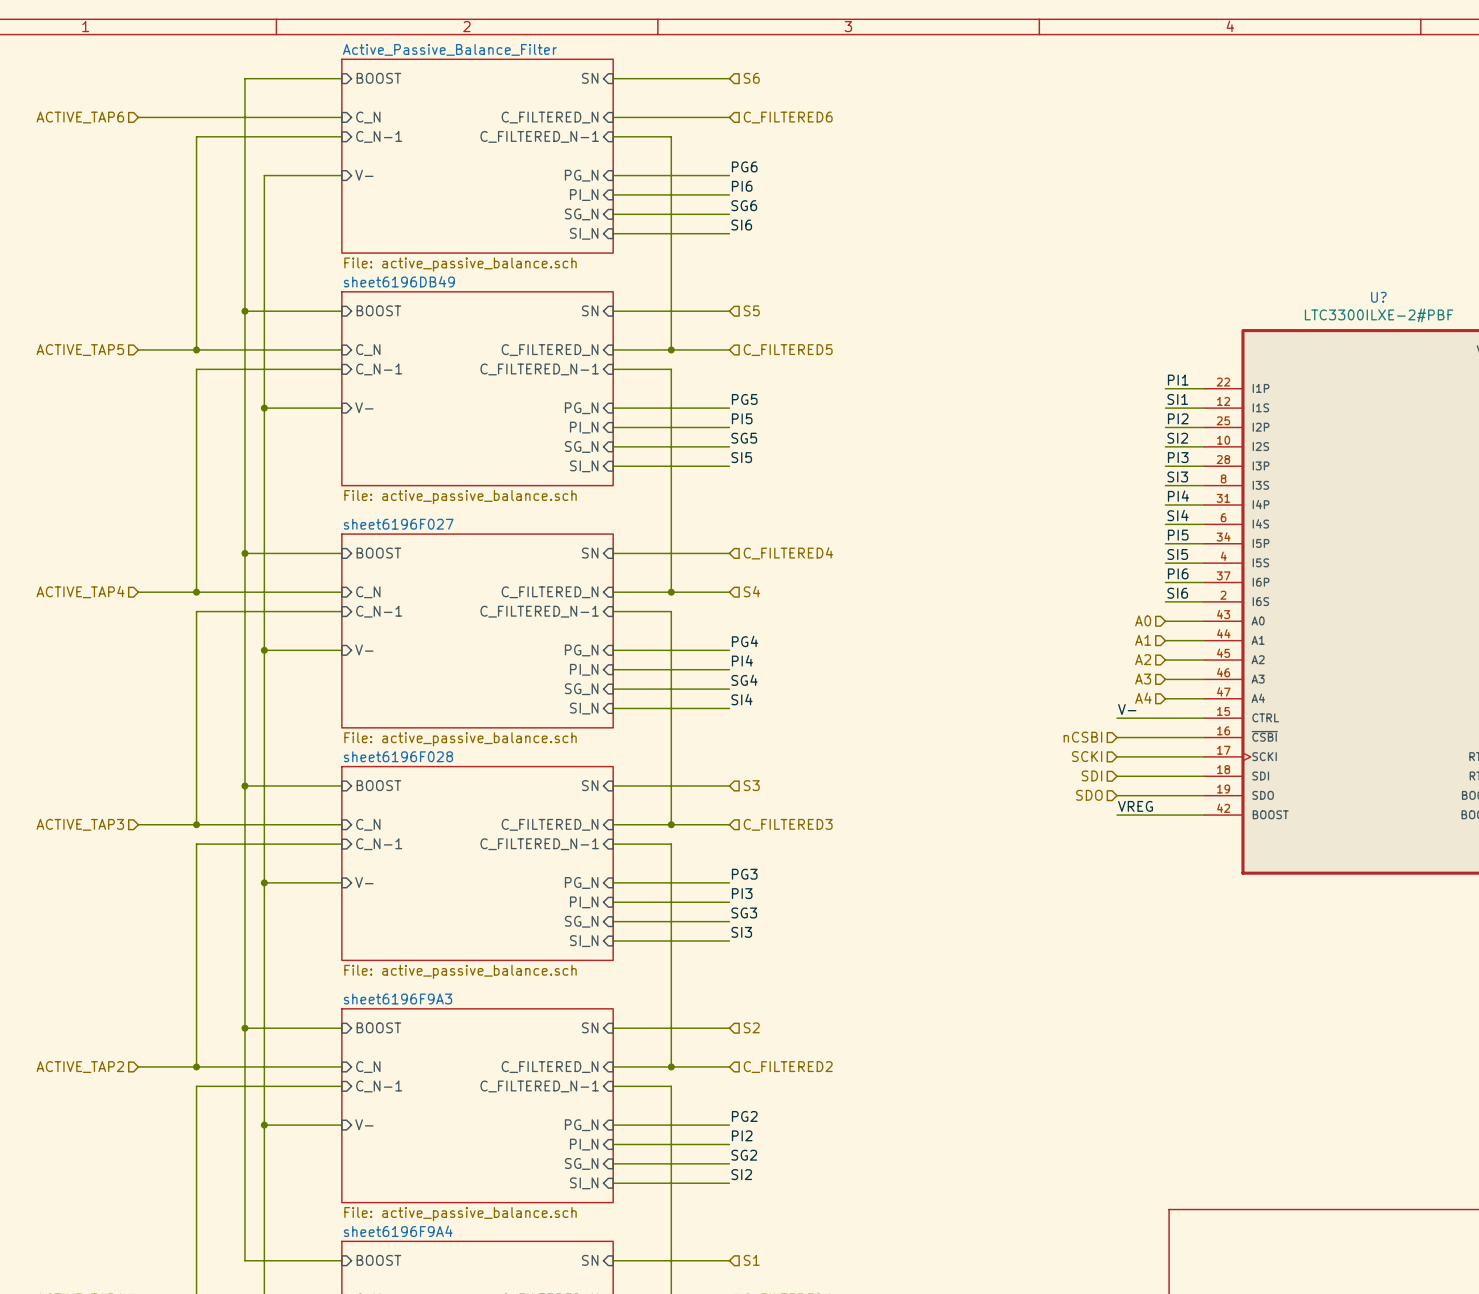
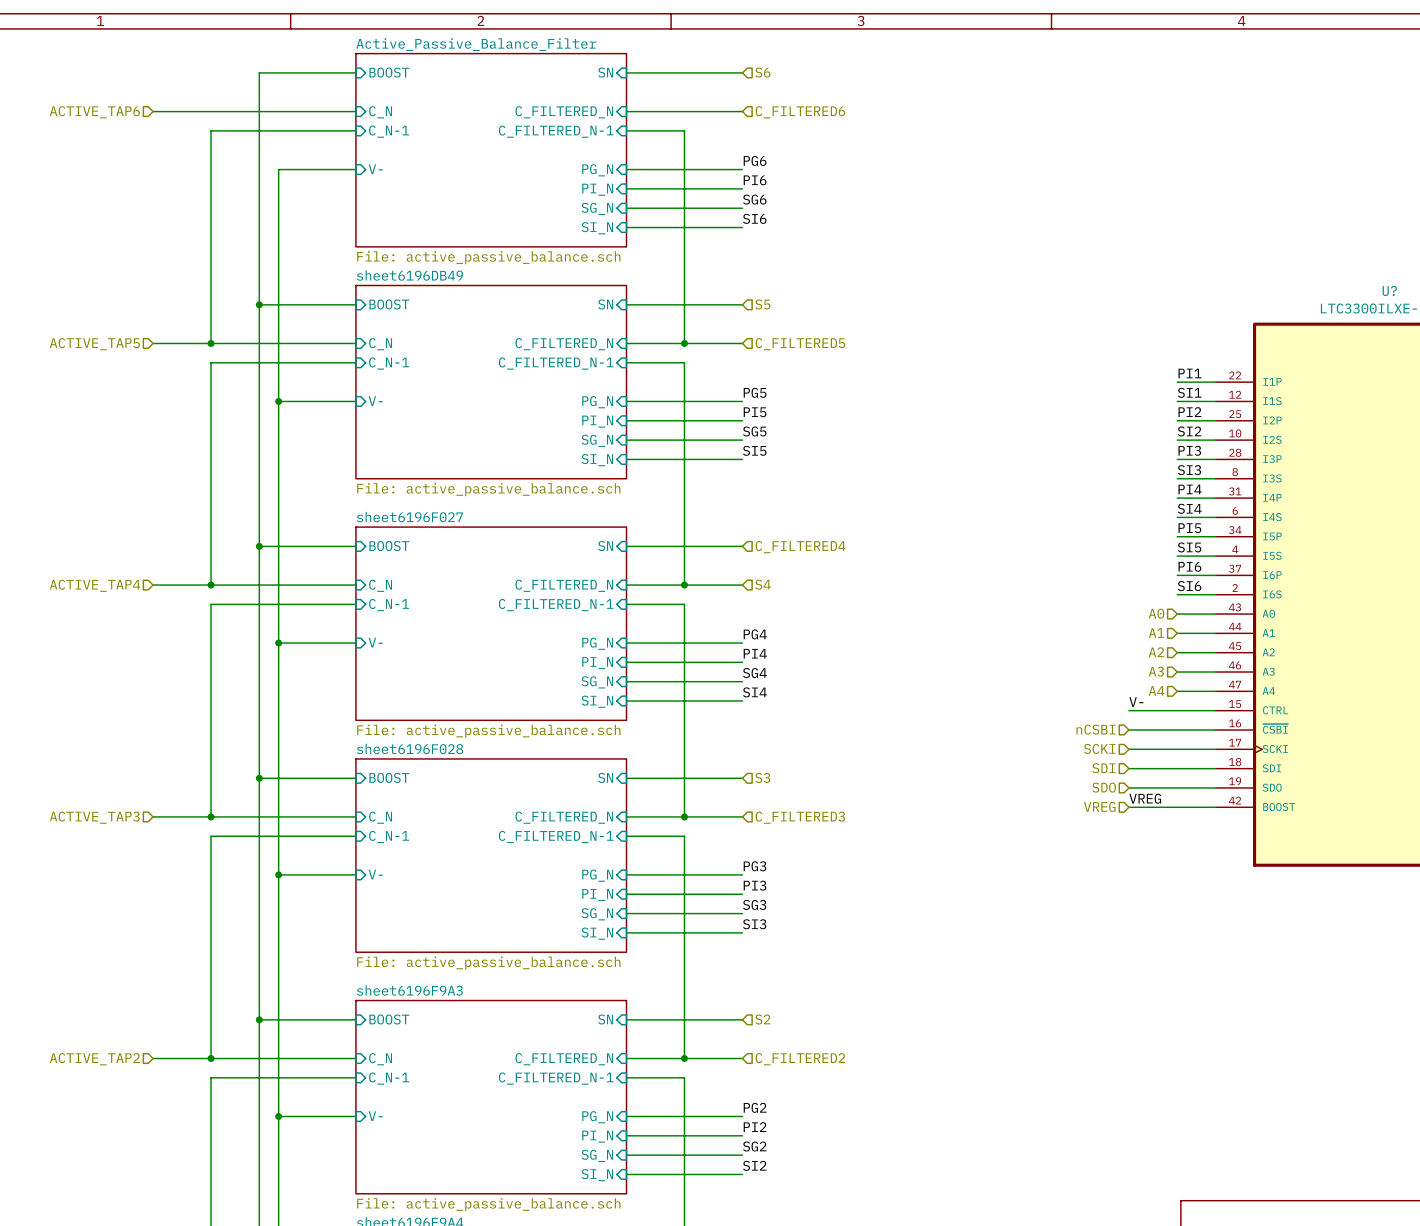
hierarchical label: none -> VREG (1099, 806)

